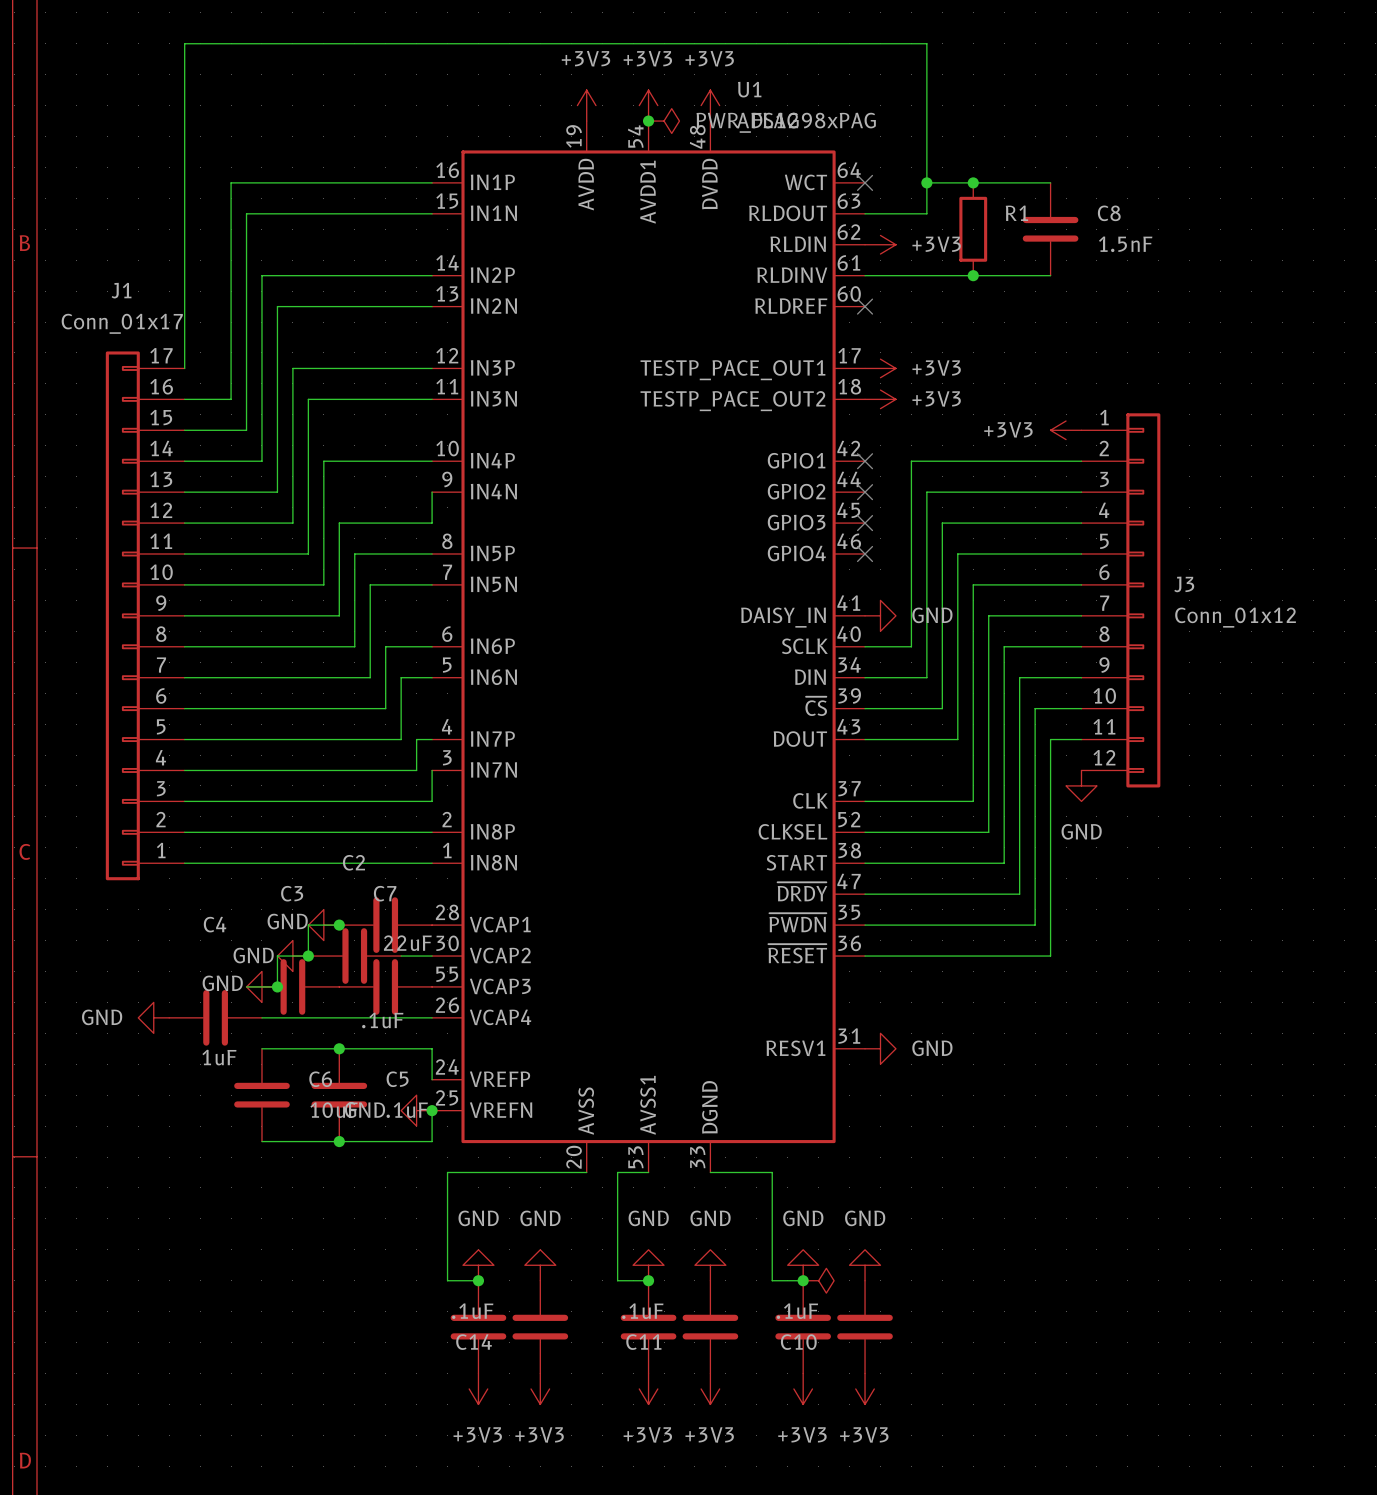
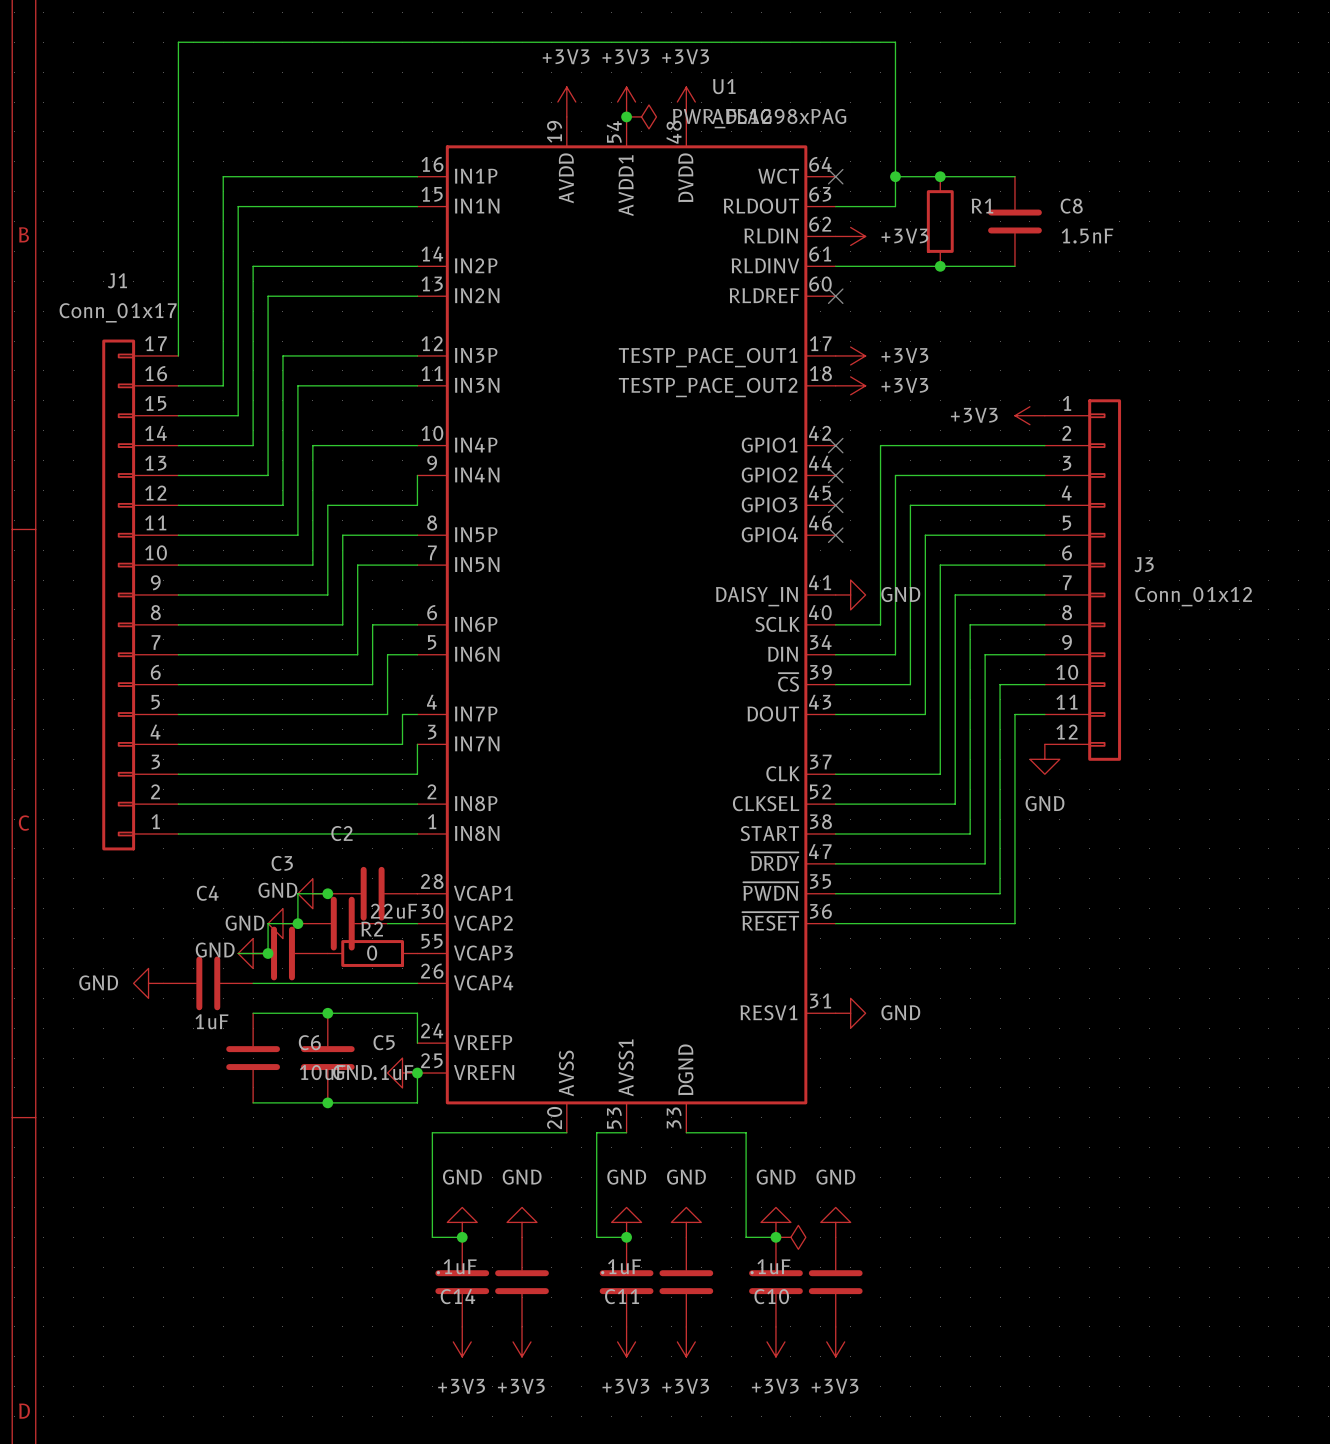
C7: .1uF (385, 986) -> none
R2: none -> 0 (372, 953)

